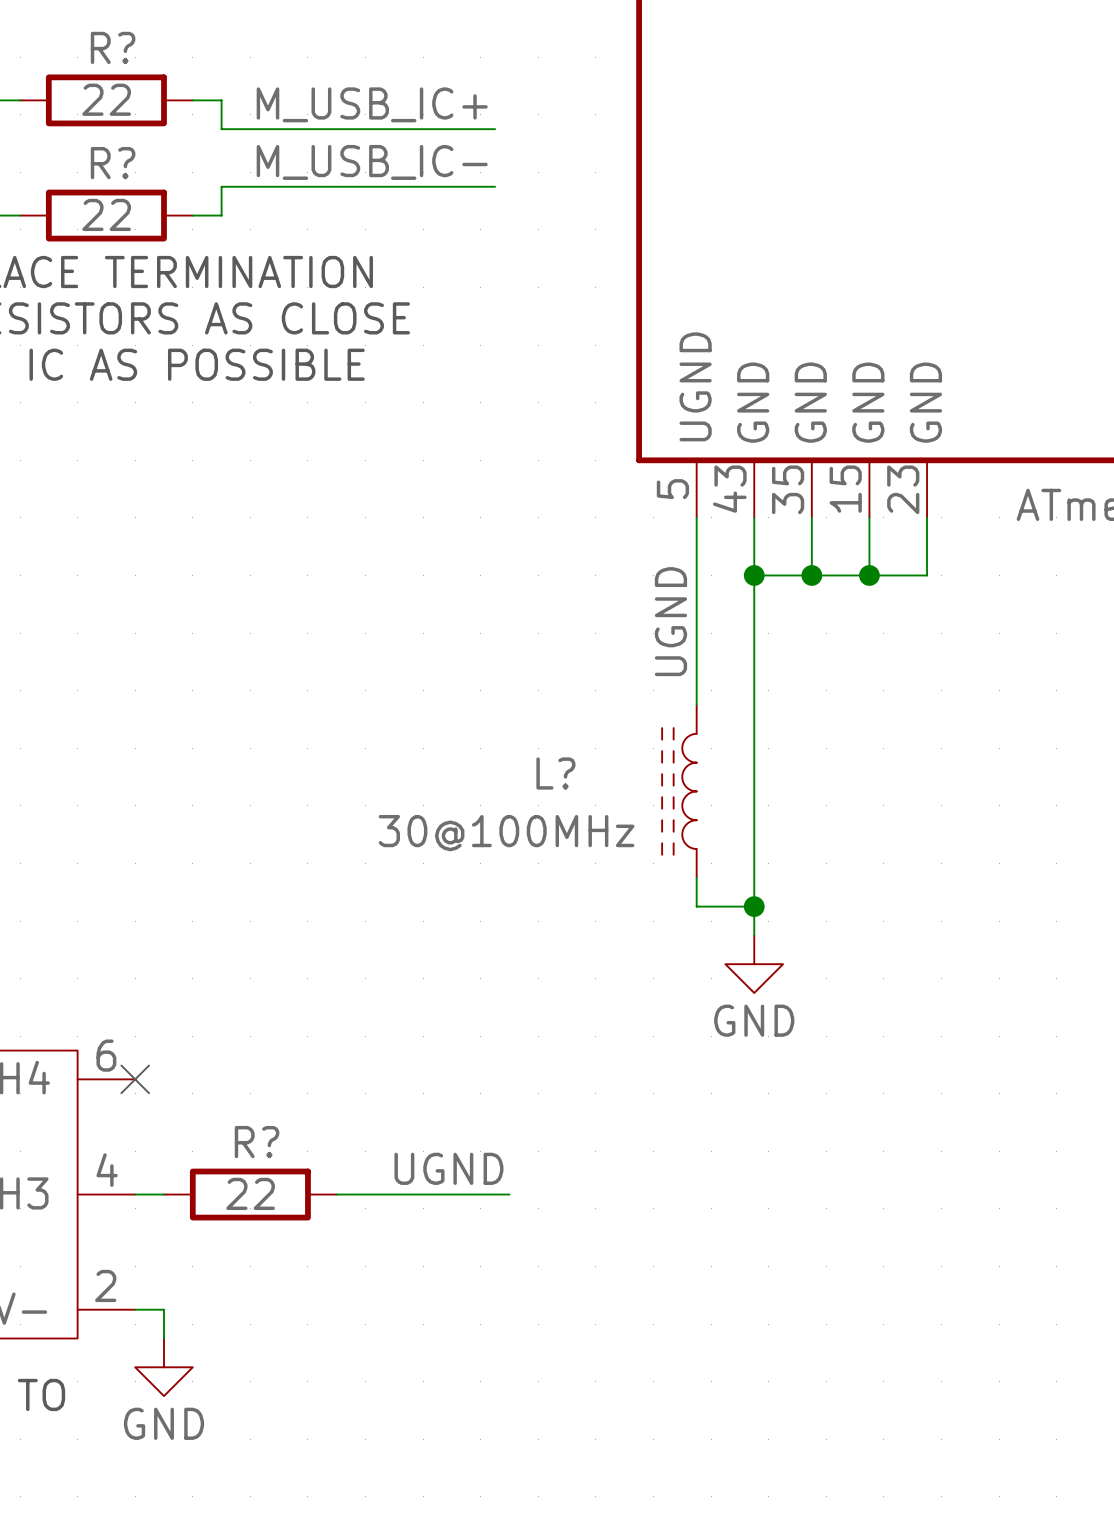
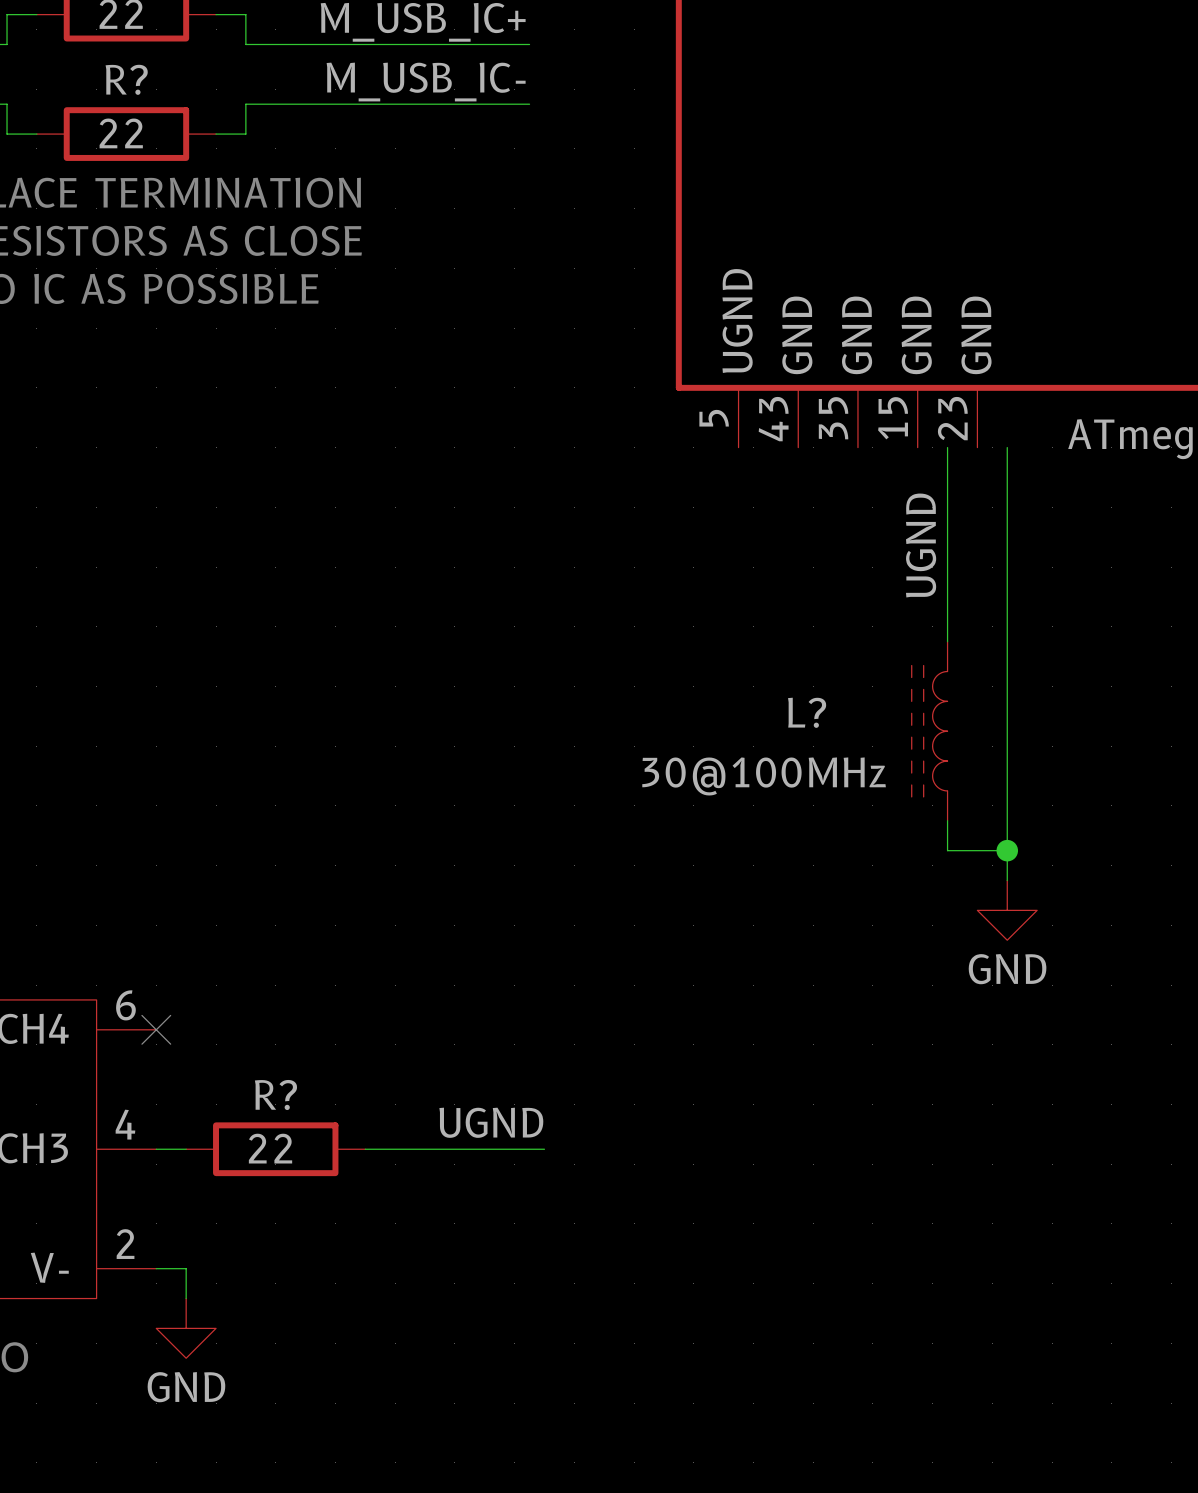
wire: (696, 517) (696, 705) -> (947, 447) (947, 641)
wire: (754, 517) (754, 935) -> (1007, 447) (1007, 880)
wire: (811, 517) (811, 575) -> none
wire: (869, 517) (869, 575) -> none
wire: (927, 517) (927, 575) (754, 575) -> none
junction: (754, 575) -> none
junction: (811, 575) -> none
junction: (869, 575) -> none
label position: UGND (670, 621) -> UGND (921, 545)
L? position: (679, 791) -> (929, 731)
wire: (696, 877) (696, 906) (754, 906) -> (947, 820) (947, 850) (1007, 850)
junction: (754, 906) -> none
junction: none -> (1007, 850)
power symbol position: GND (754, 964) -> GND (1007, 910)

